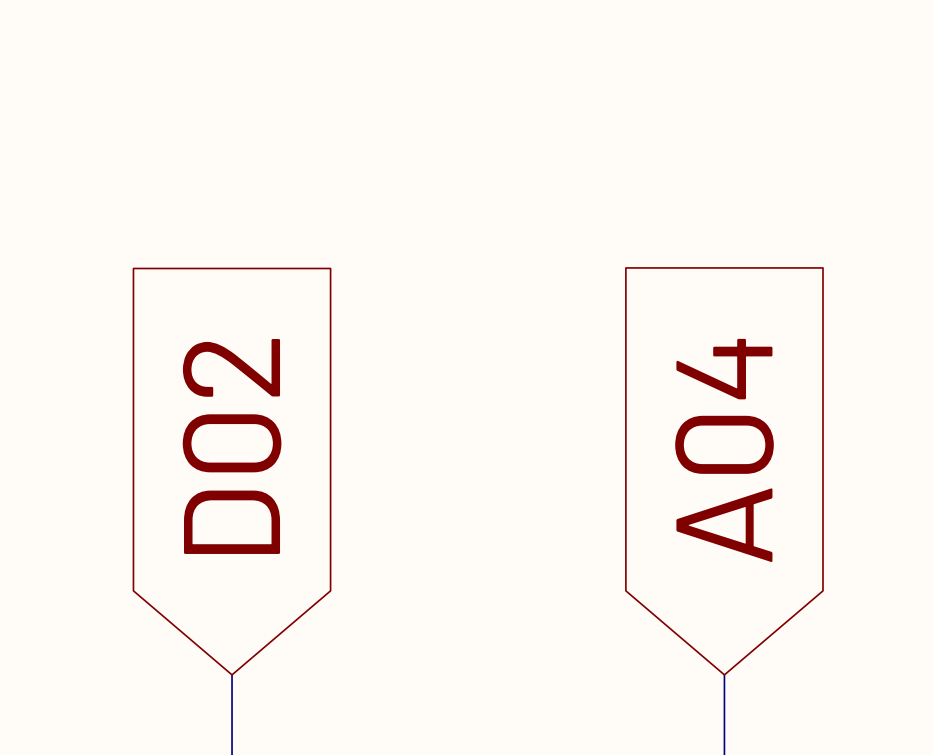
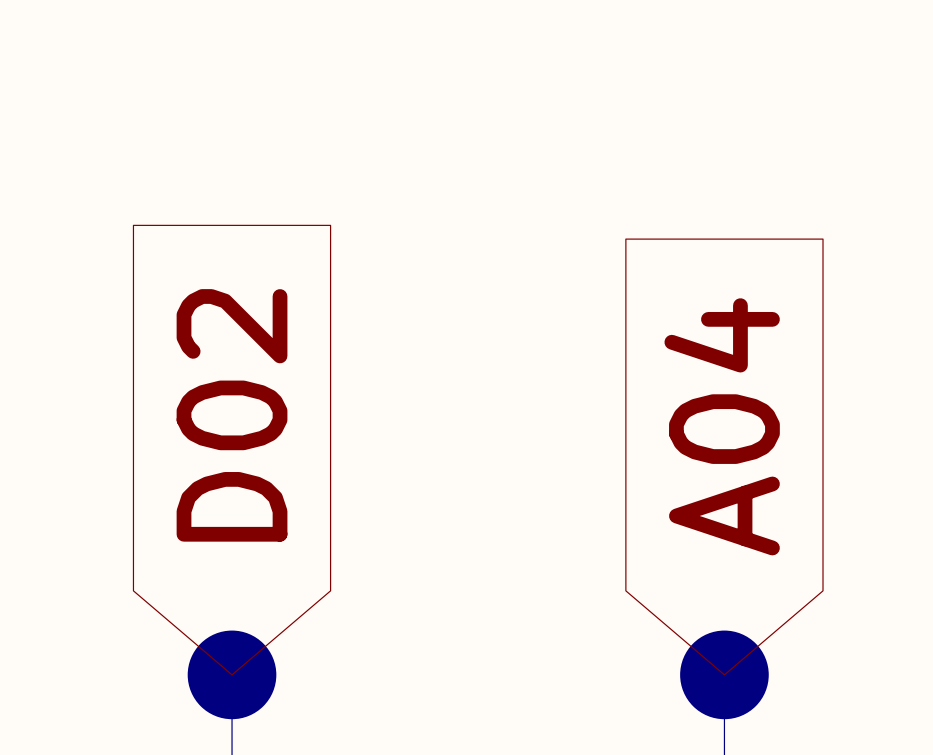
junction: none -> (232, 674)
junction: none -> (724, 674)

